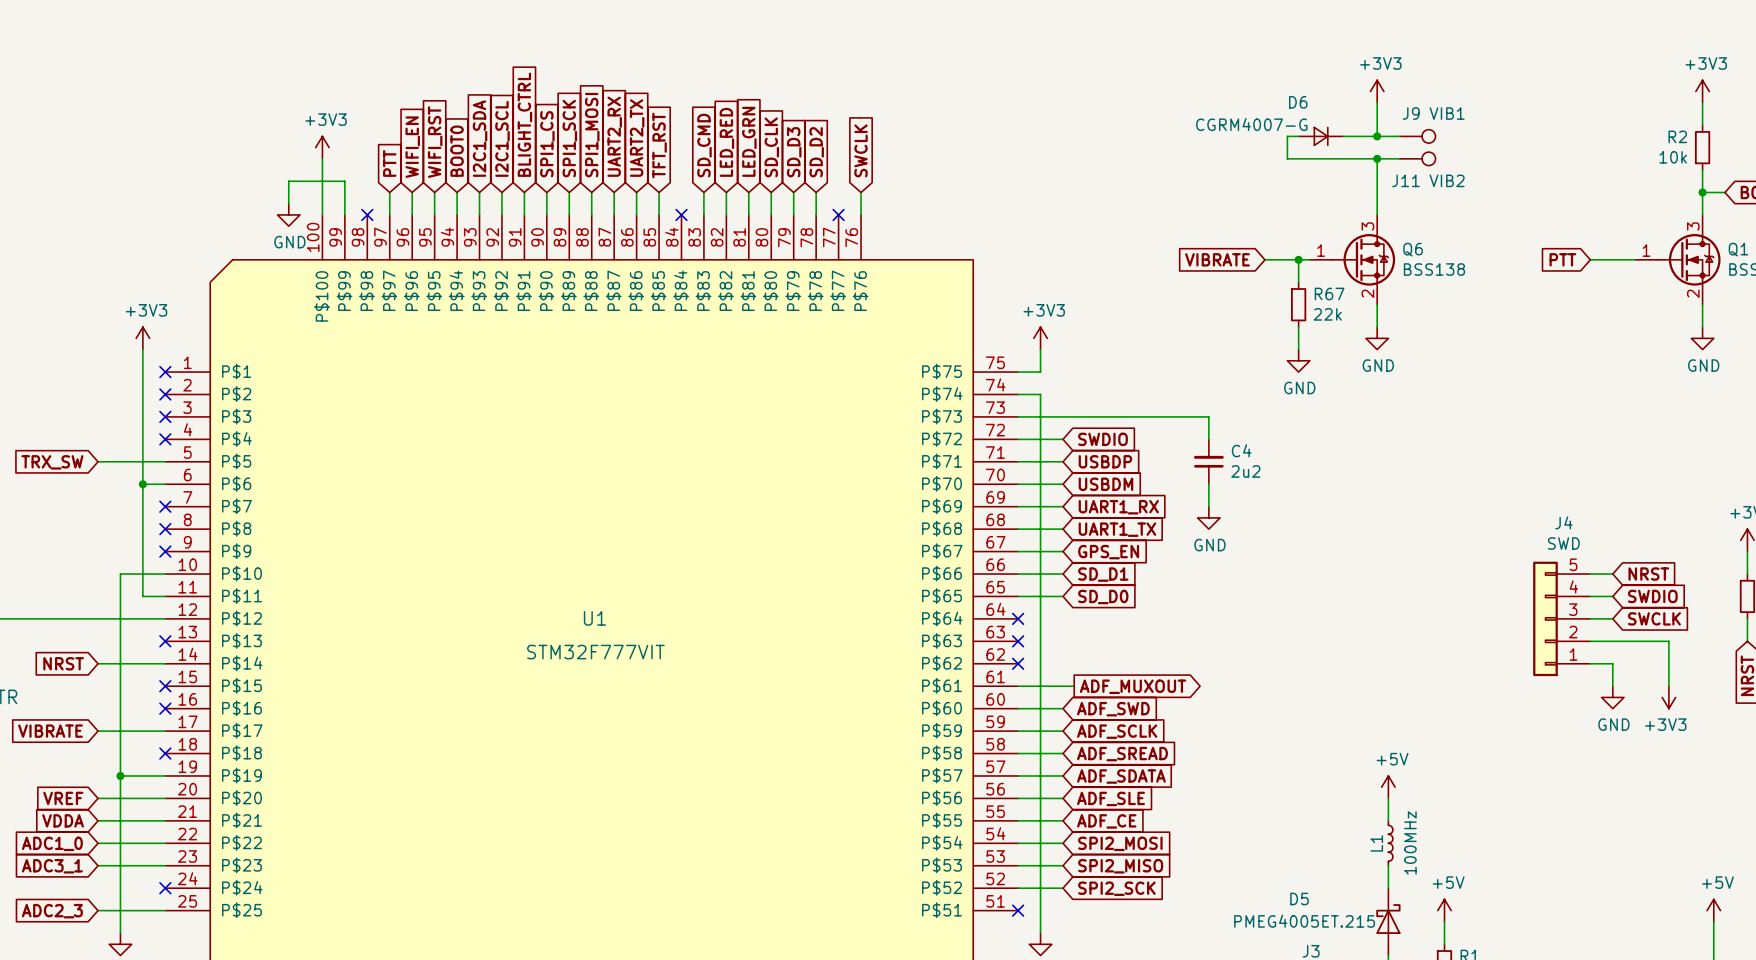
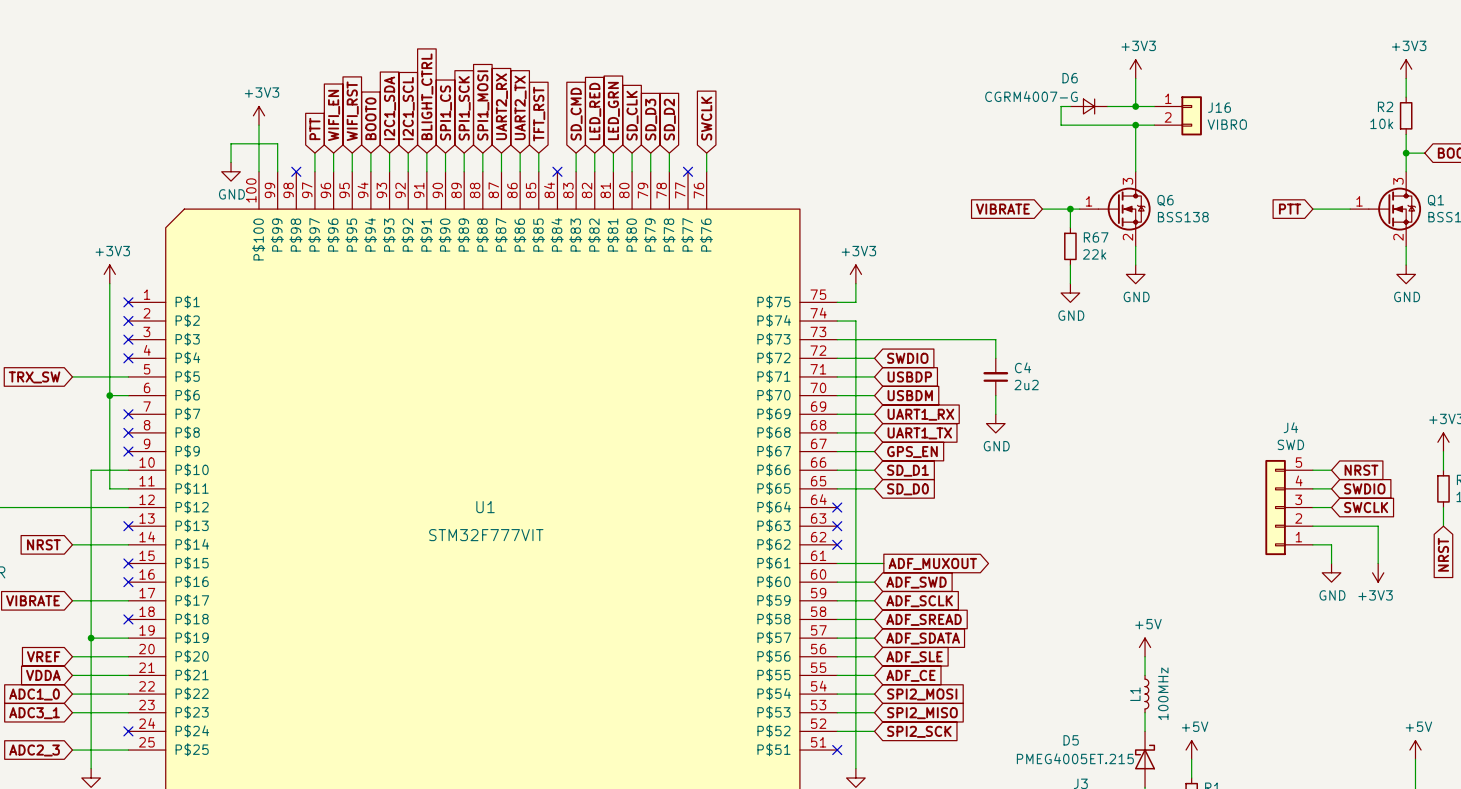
J9: VIB1 (1417, 136) -> none
J16: none -> VIBRO (1178, 115)
J11: VIB2 (1417, 158) -> none

